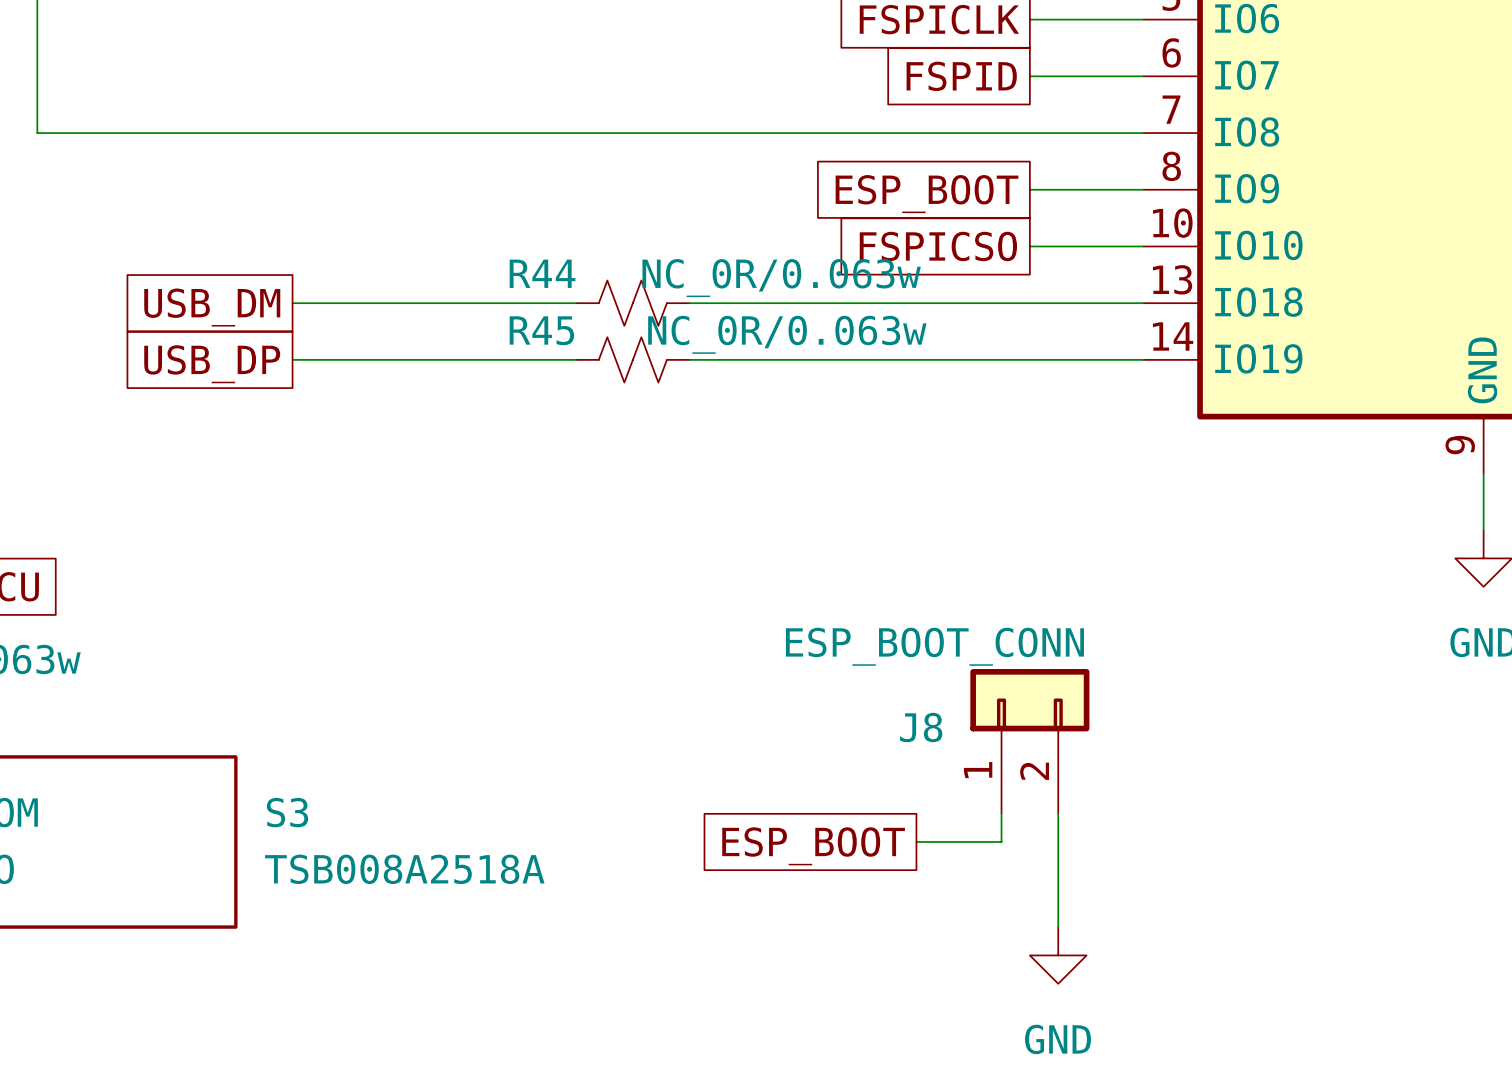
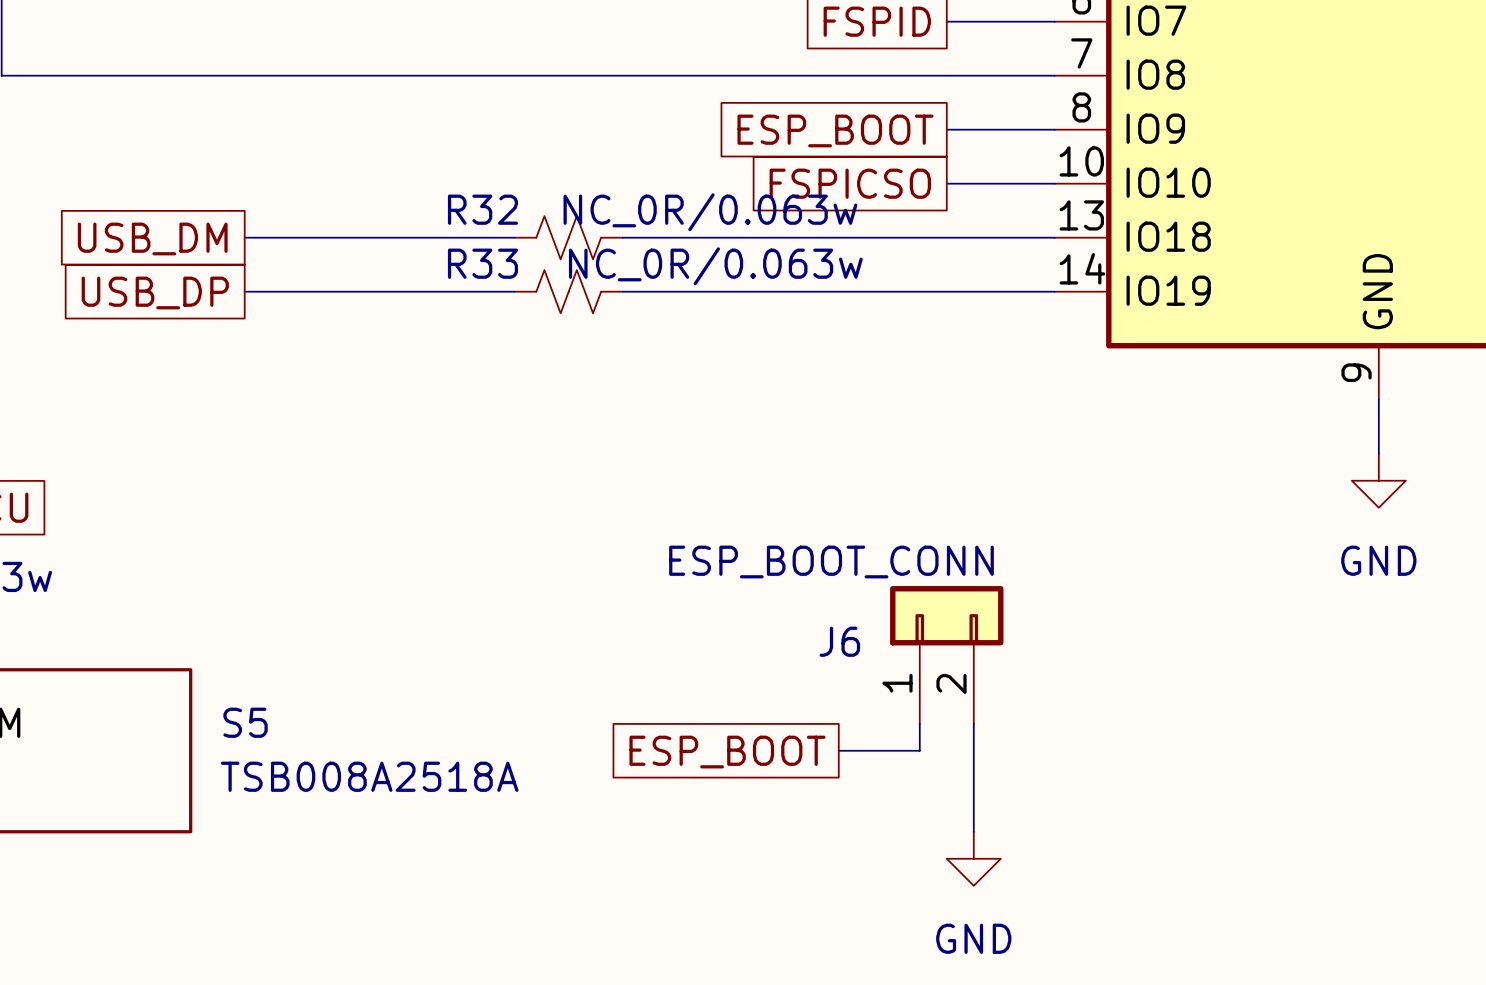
R44 name: R44 (542, 273) -> R32 (482, 209)
R45 name: R45 (541, 330) -> R33 (482, 263)
J8 name: J8 (921, 727) -> J6 (839, 641)
S3 name: S3 (287, 812) -> S5 (245, 722)

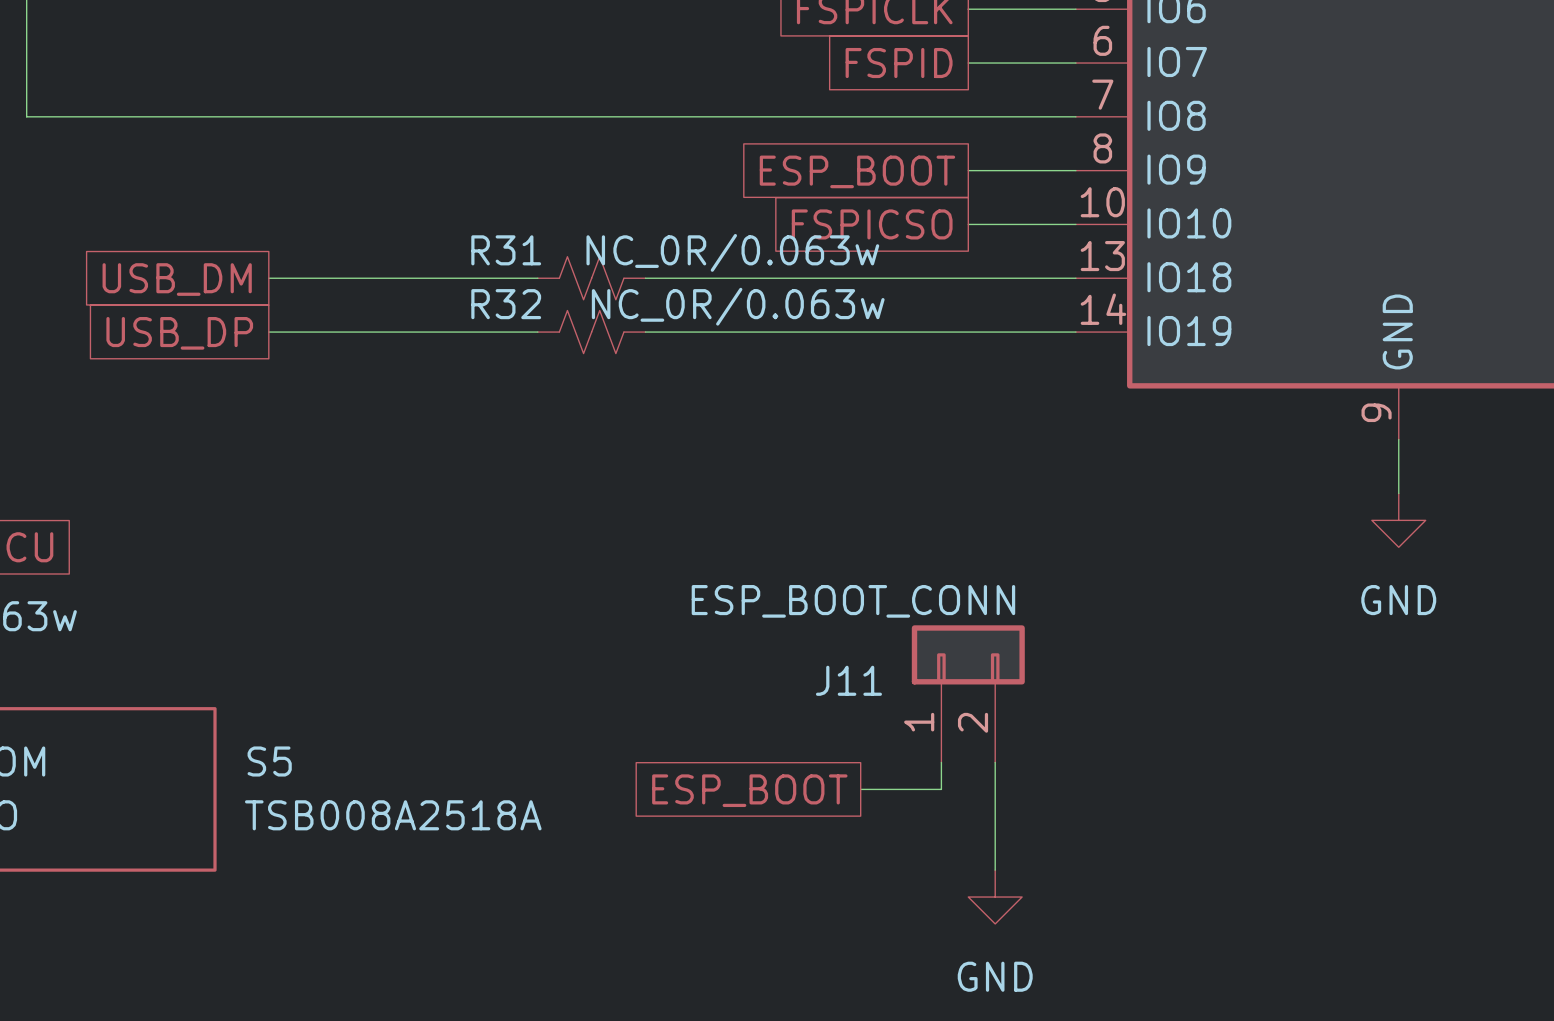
R32 name: R32 (482, 209) -> R31 (506, 250)
R33 name: R33 (482, 263) -> R32 (506, 304)
J6 name: J6 (839, 641) -> J11 (848, 680)

